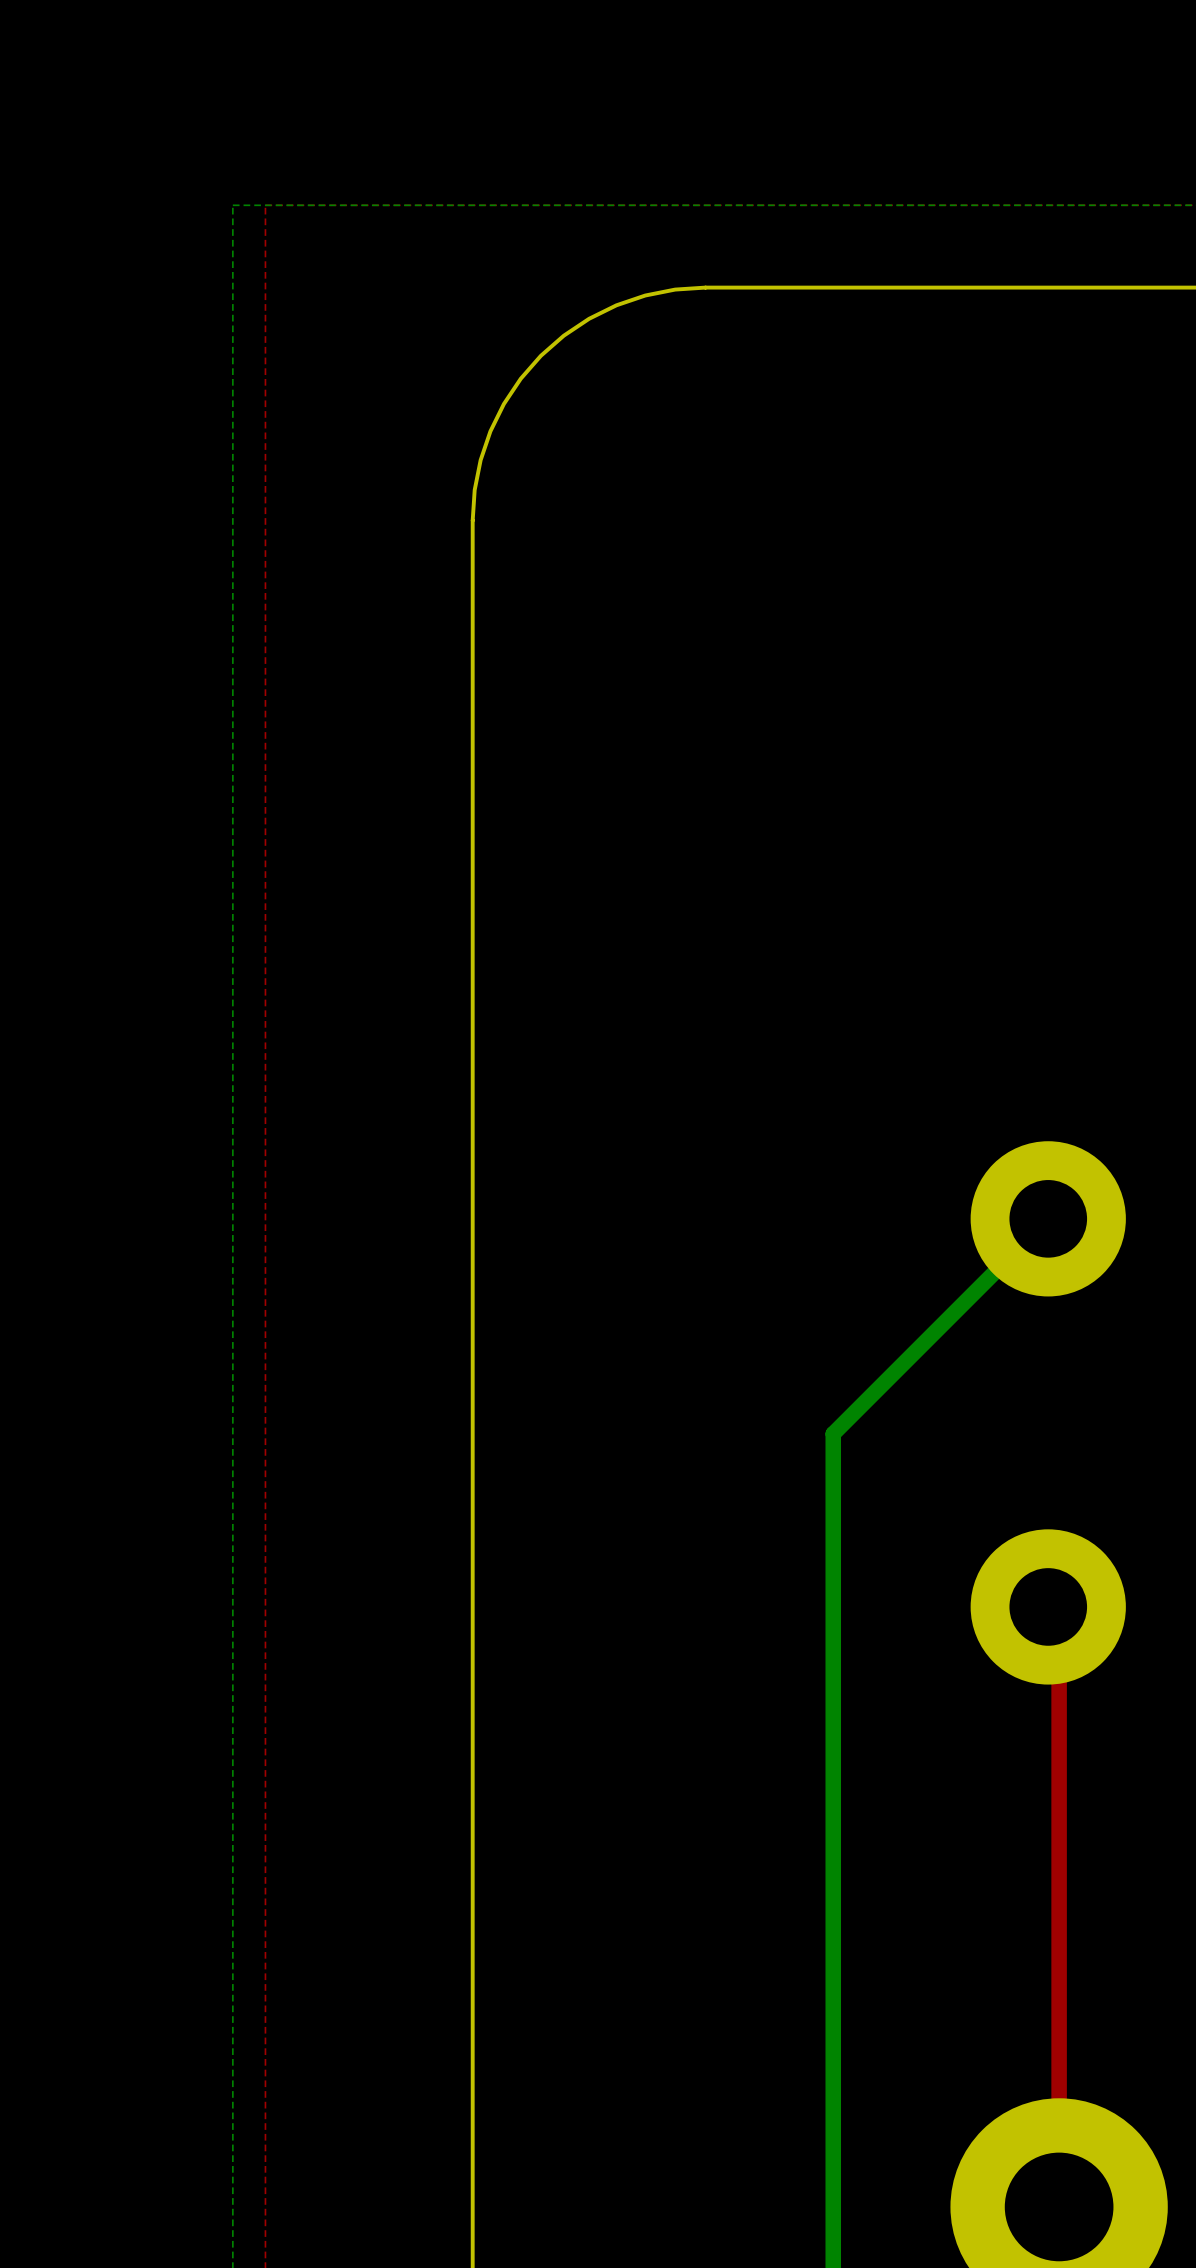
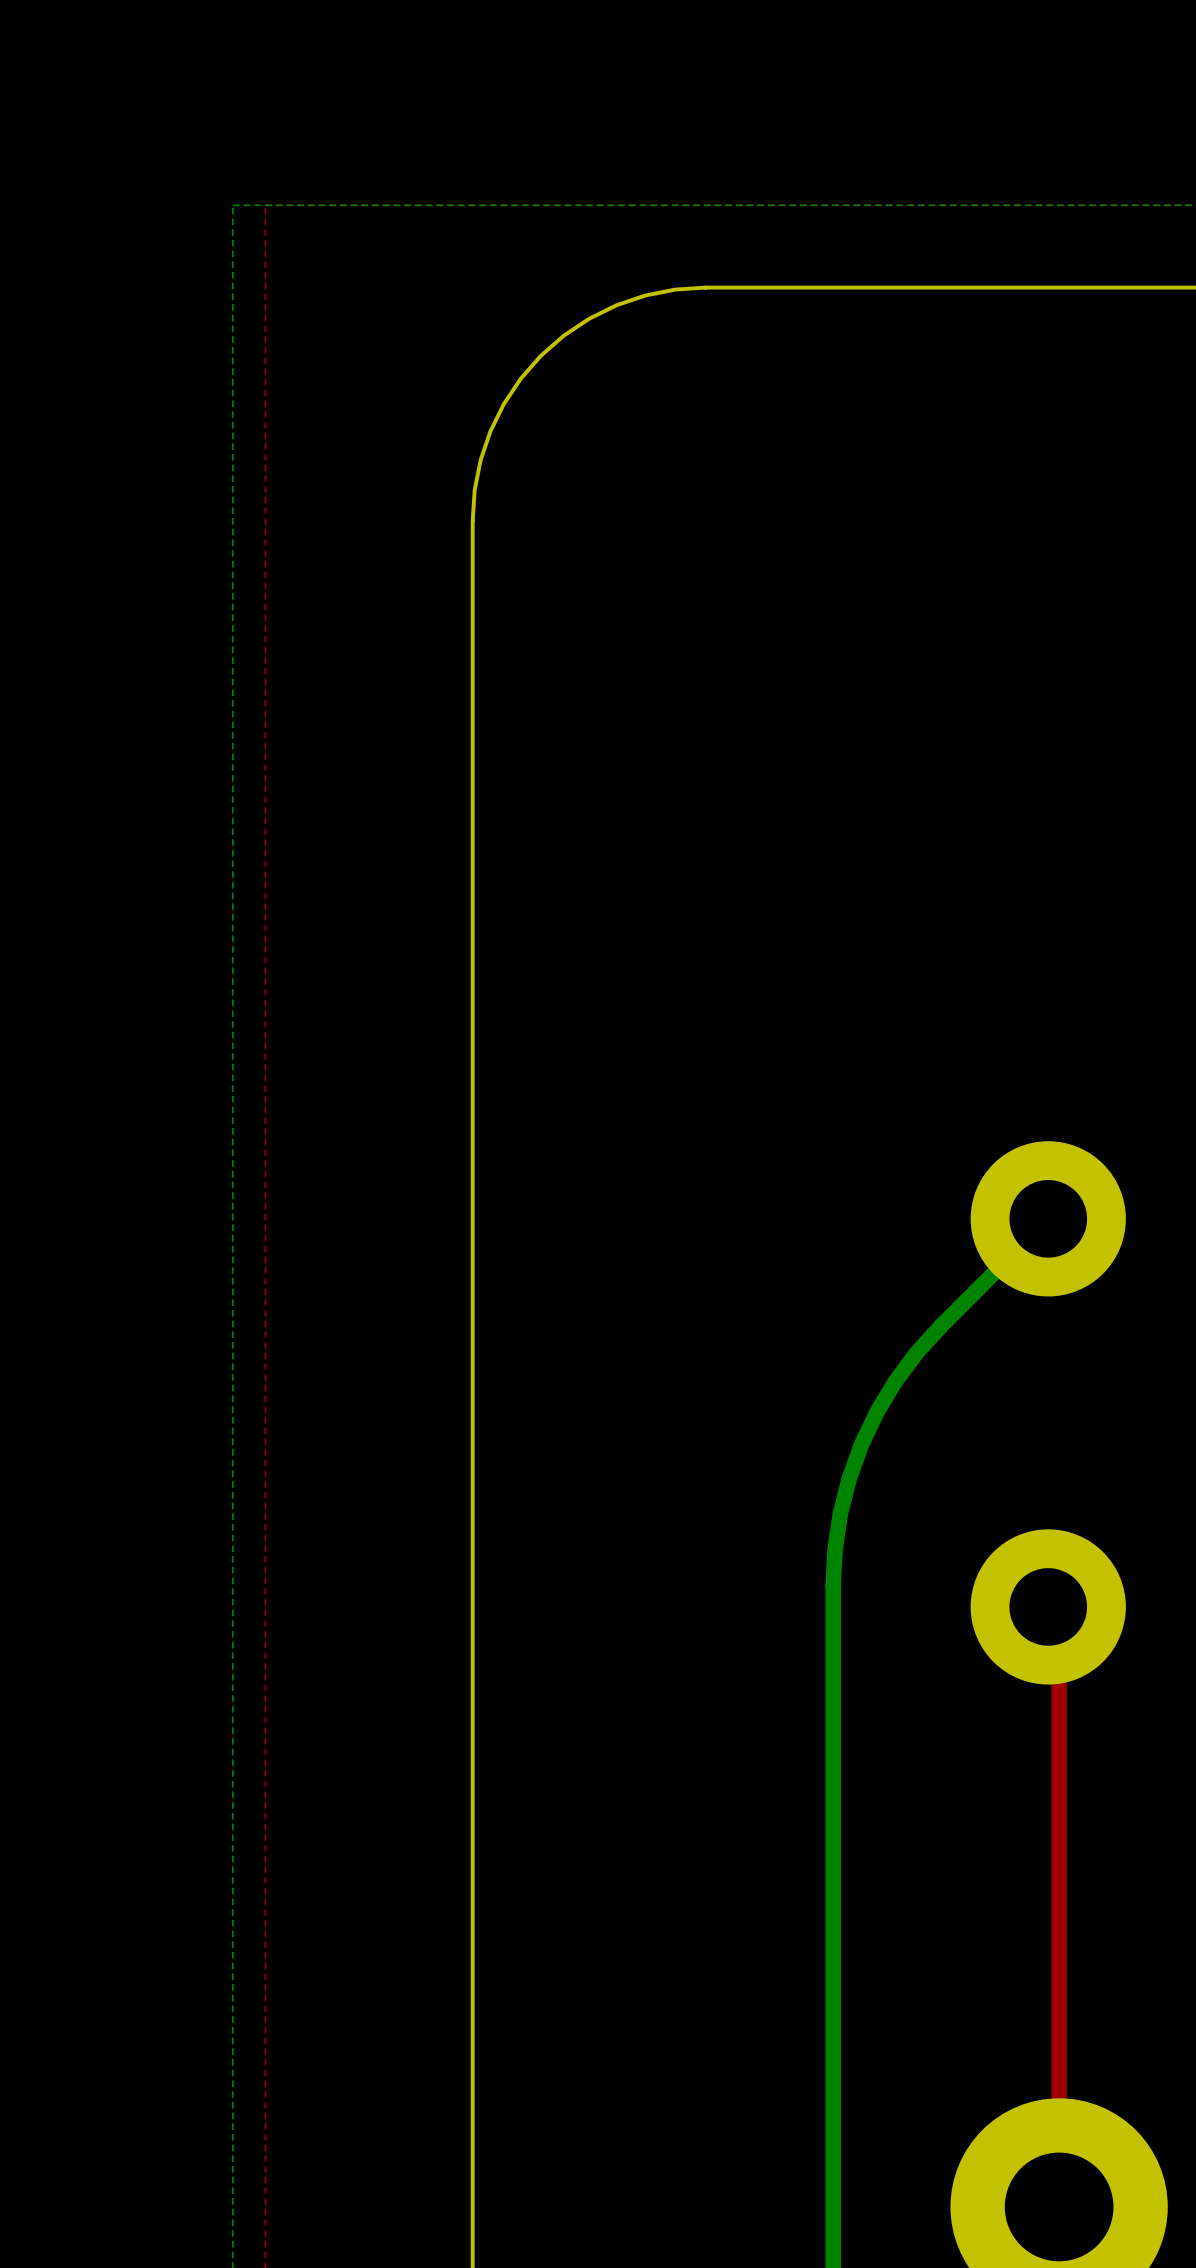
bottom track: (940, 1326) (833, 1433) (833, 1585) -> (940, 1326) (916, 1353) (895, 1381) (876, 1412) (861, 1445) (849, 1479) (840, 1514) (835, 1549) (833, 1585)

